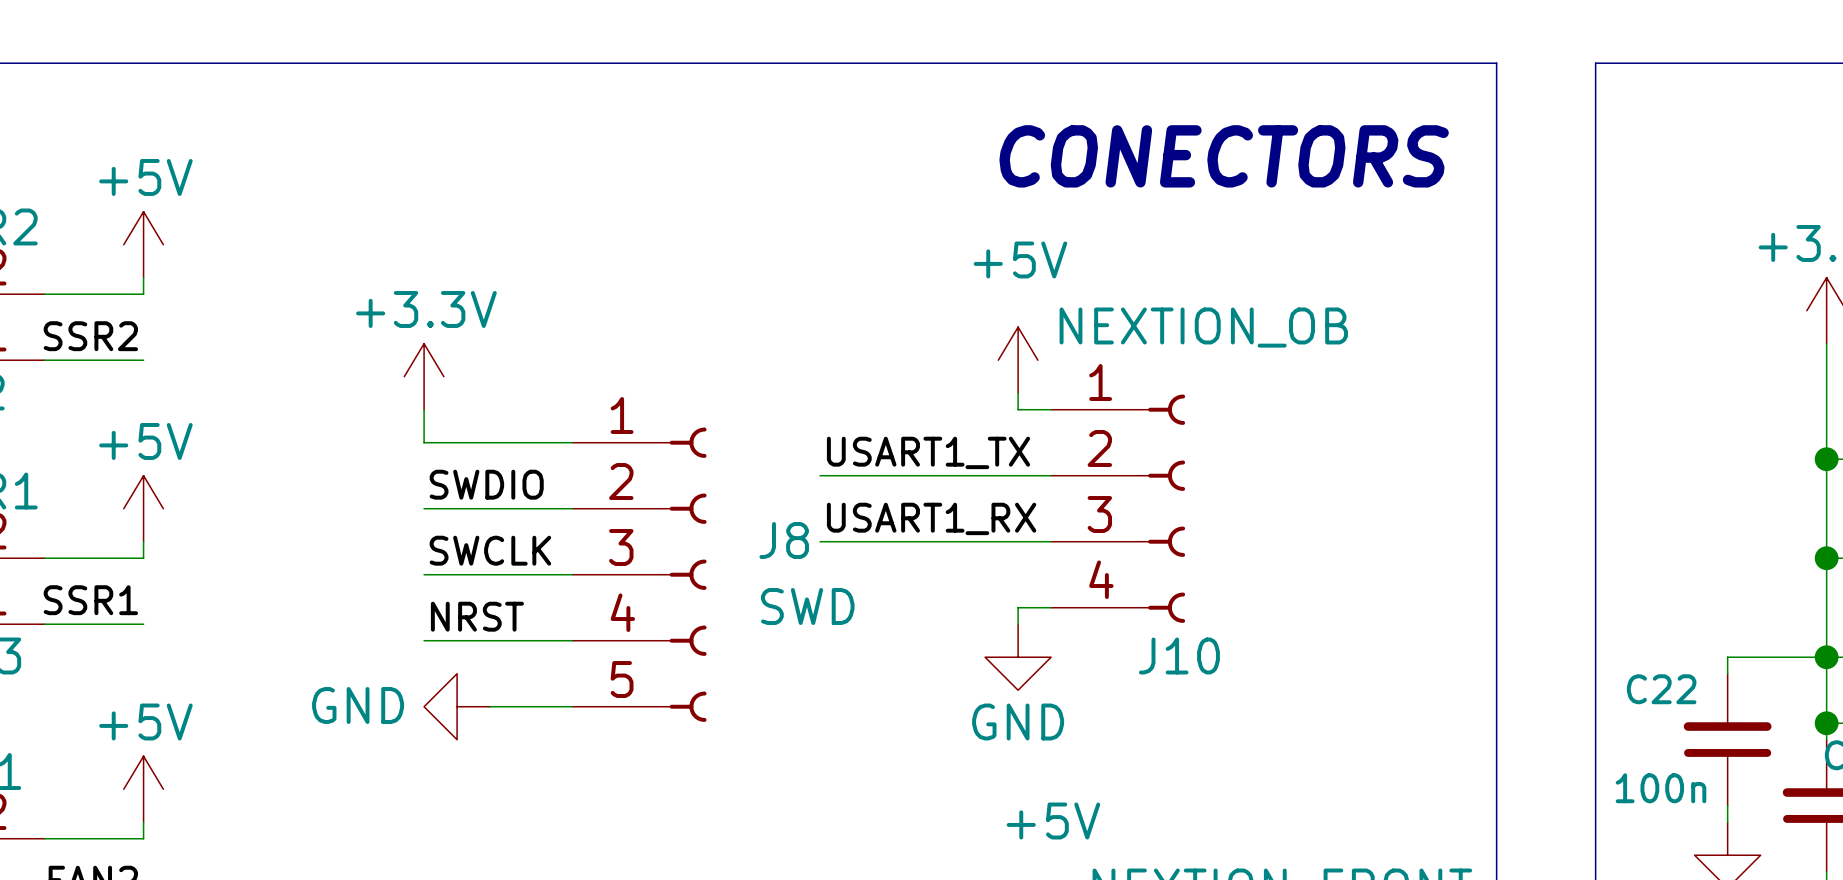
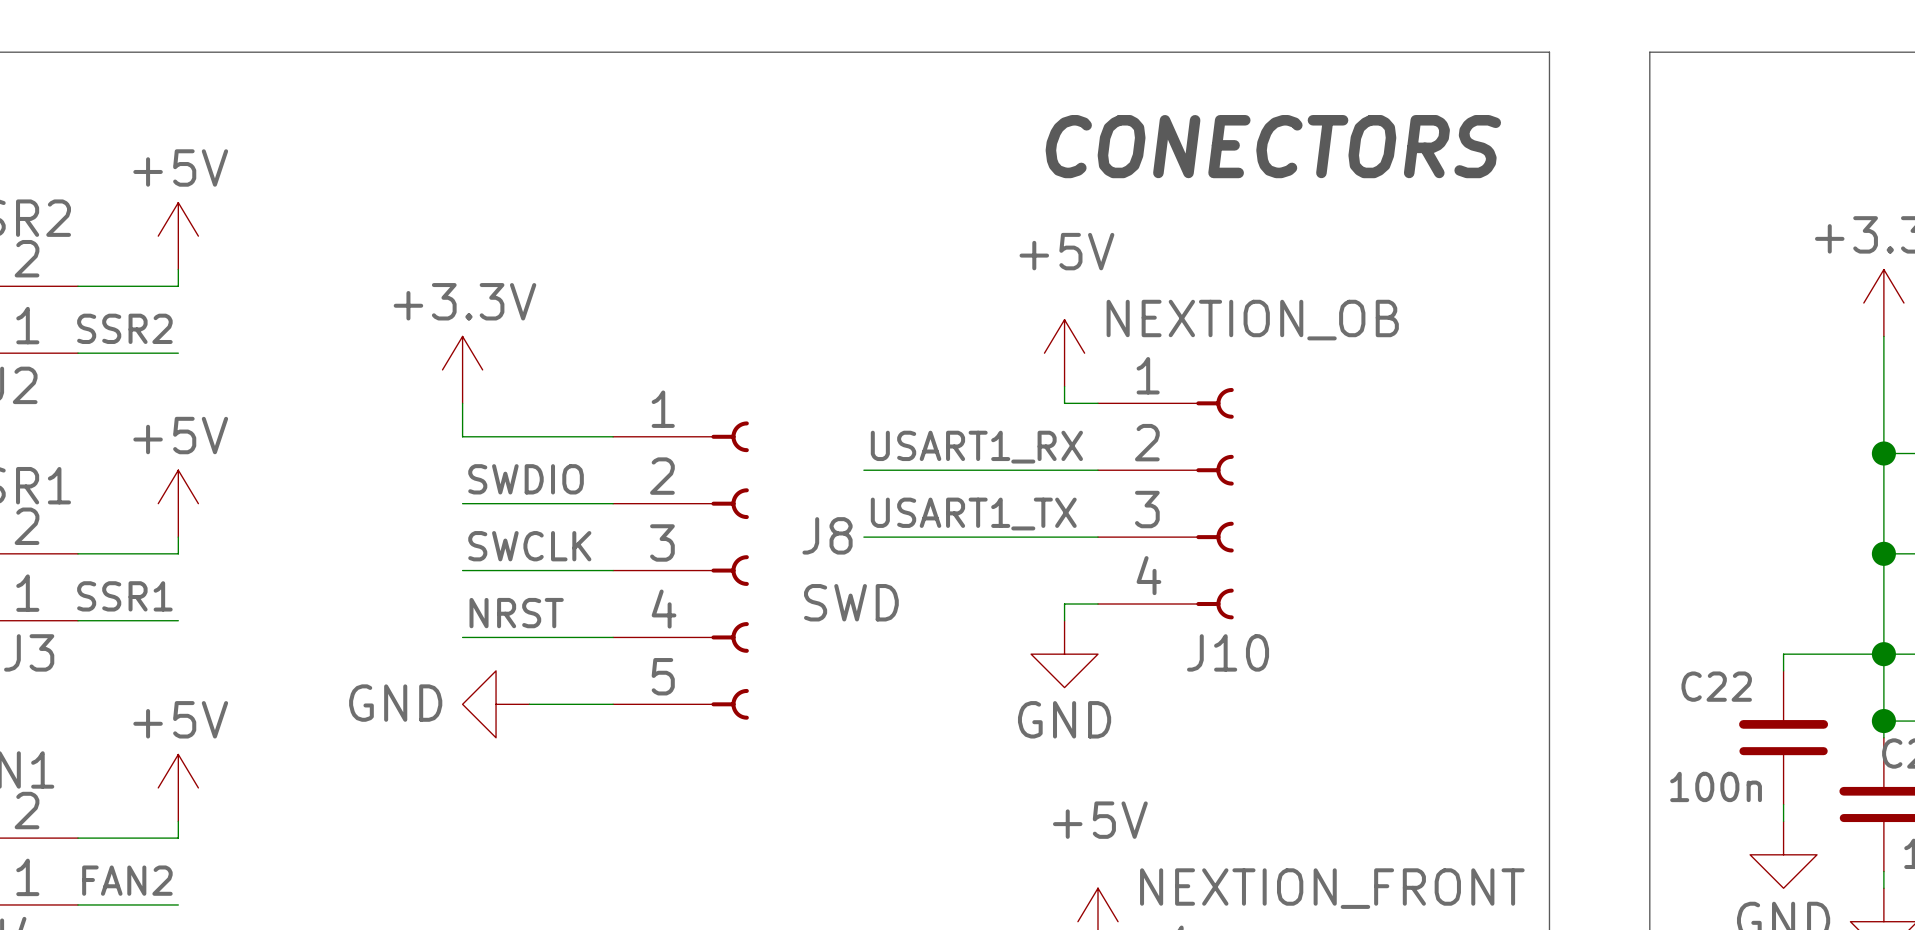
label: USART1_TX (928, 452) -> USART1_RX (976, 447)
label: USART1_RX (931, 518) -> USART1_TX (973, 514)

